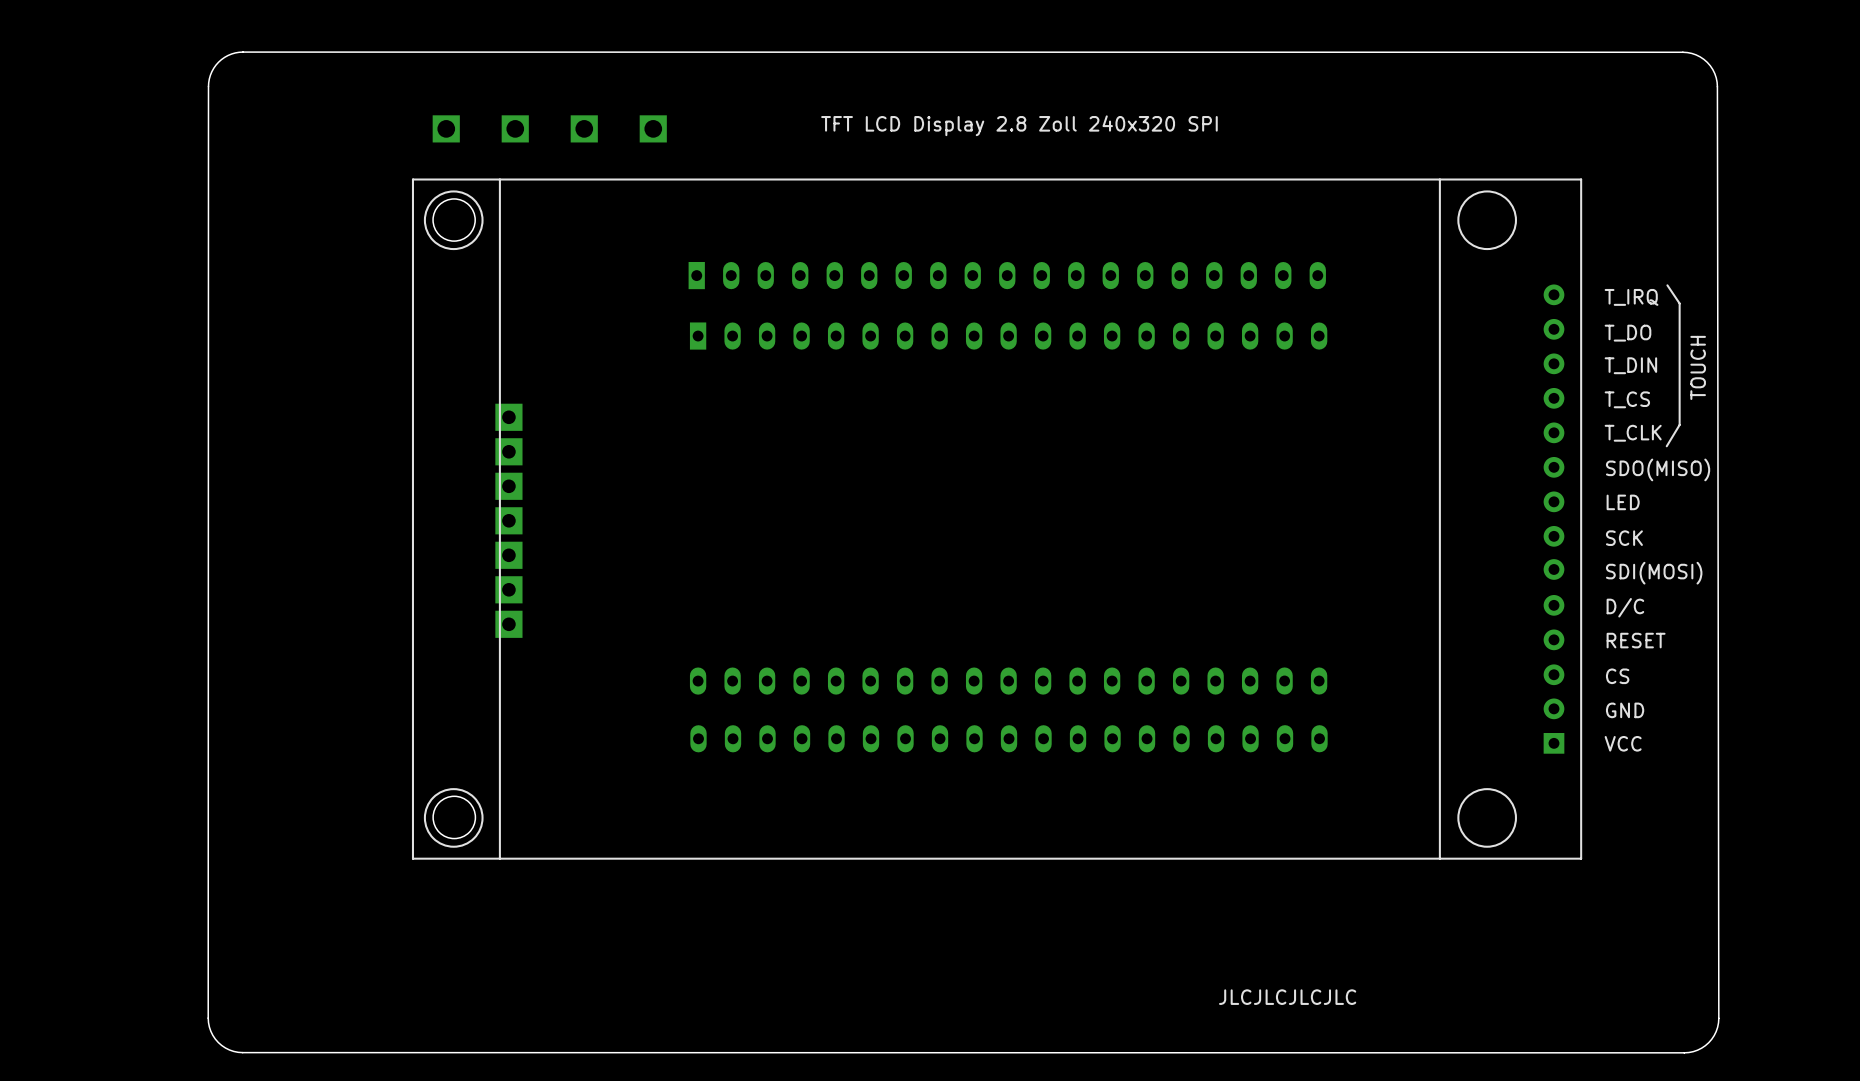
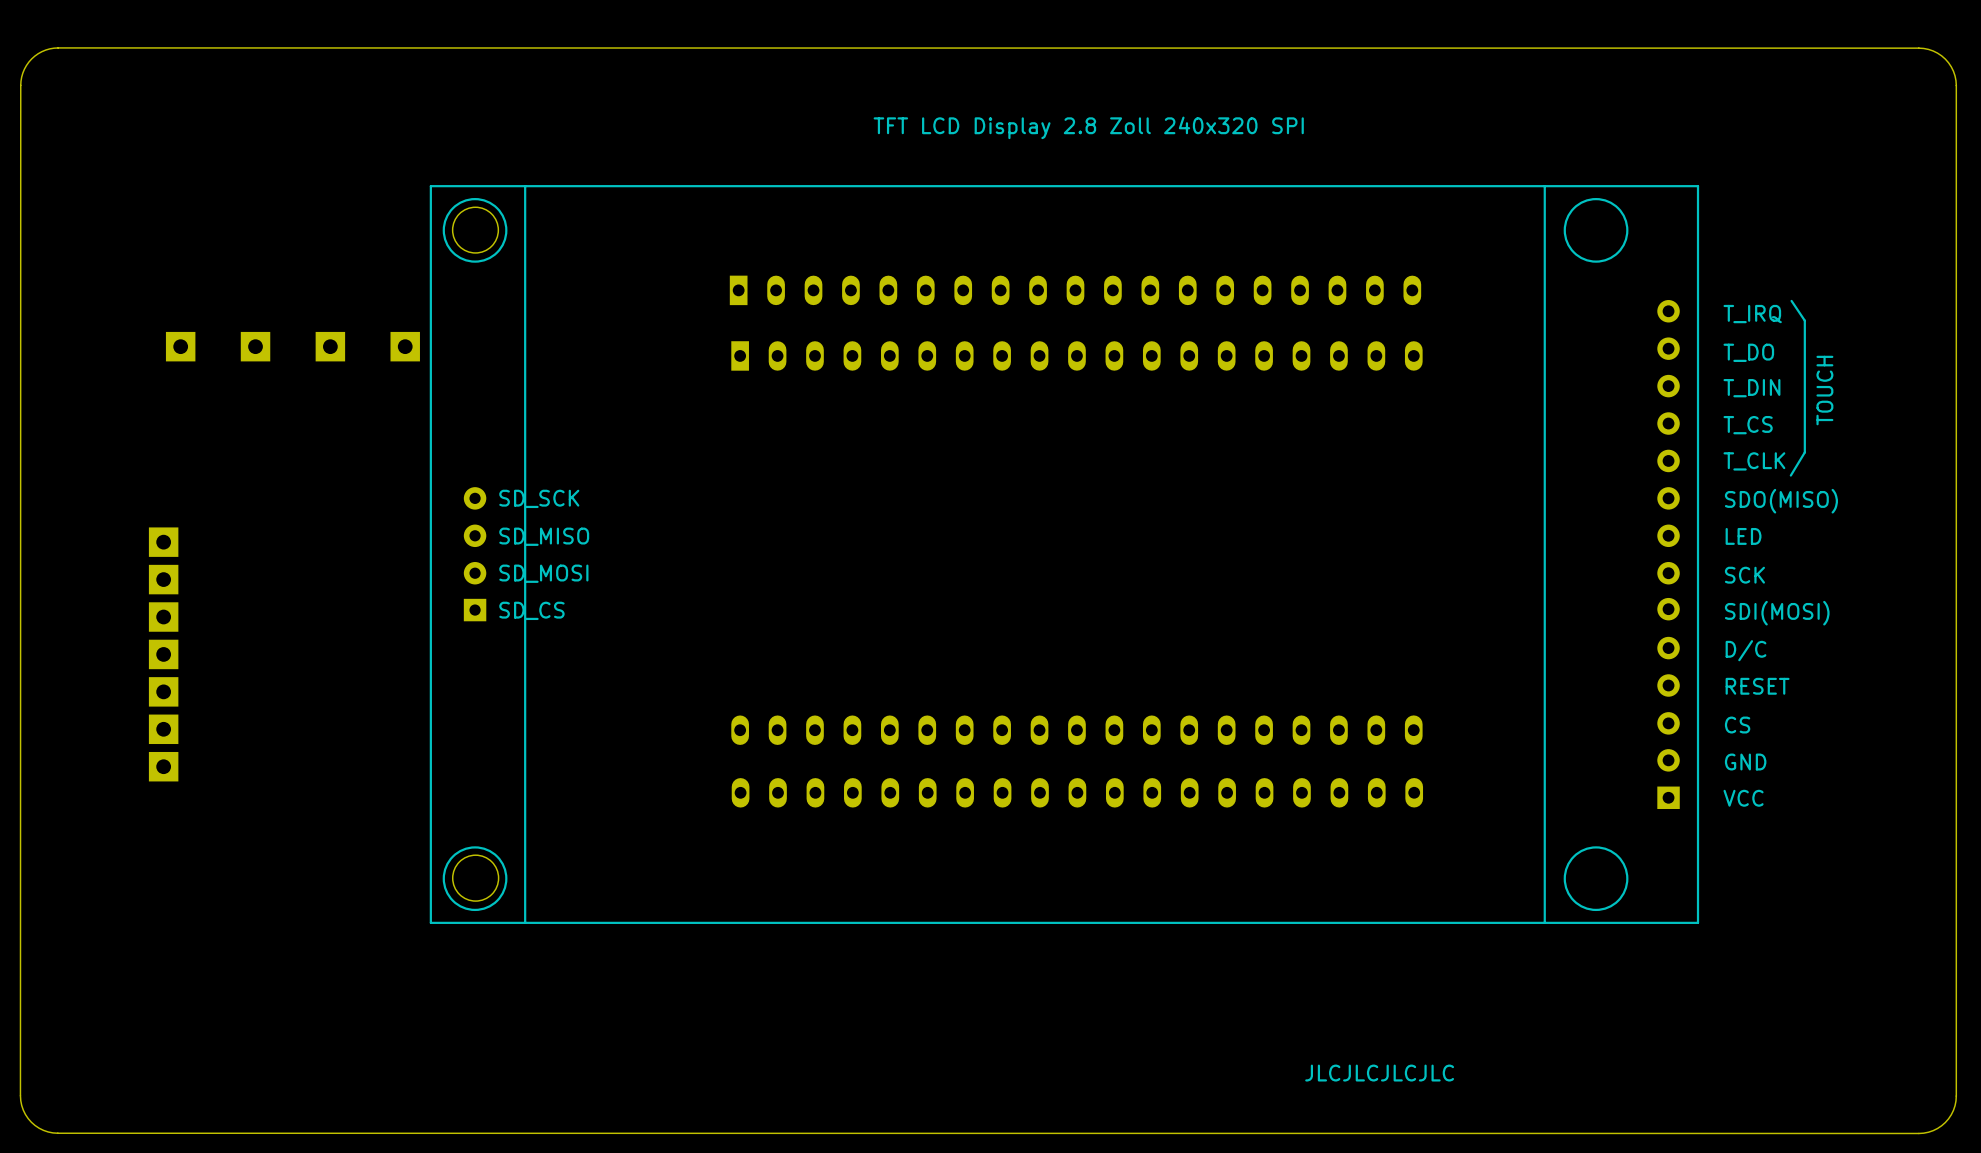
part: (446, 128) -> none
part: (515, 128) -> none
part: (584, 128) -> none
part: (653, 128) -> none
part footprint: [411, 178, 1681, 860] -> [429, 185, 1806, 924]
part: none -> (180, 346)
part: none -> (255, 346)
part: none -> (330, 346)
part: none -> (405, 346)
part: (508, 417) -> none
part: (508, 451) -> none
part: (508, 486) -> none
part: none -> (163, 542)
part: (508, 520) -> none
part: none -> (163, 579)
part: (508, 555) -> none
part: none -> (163, 617)
part: (508, 589) -> none
part: none -> (163, 654)
part: (508, 624) -> none
part: none -> (163, 691)
part: none -> (163, 729)
part: none -> (163, 766)
board edge: (242, 1052) (229, 1049) (218, 1042) (210, 1031) (208, 1018) (208, 86) (211, 71) (224, 57) (242, 52) (1682, 52) (1696, 54) (1707, 62) (1714, 73) (1717, 86) (1718, 1018) (1716, 1031) (1708, 1042) (1697, 1050) (1684, 1052) -> (246, 1133) (52, 1132) (39, 1128) (31, 1122) (23, 1110) (20, 1100) (20, 85) (22, 73) (28, 62) (38, 53) (49, 48) (1918, 48) (1937, 53) (1951, 66) (1956, 85) (1955, 1100) (1951, 1114) (1945, 1122) (1928, 1132) (1809, 1133)

